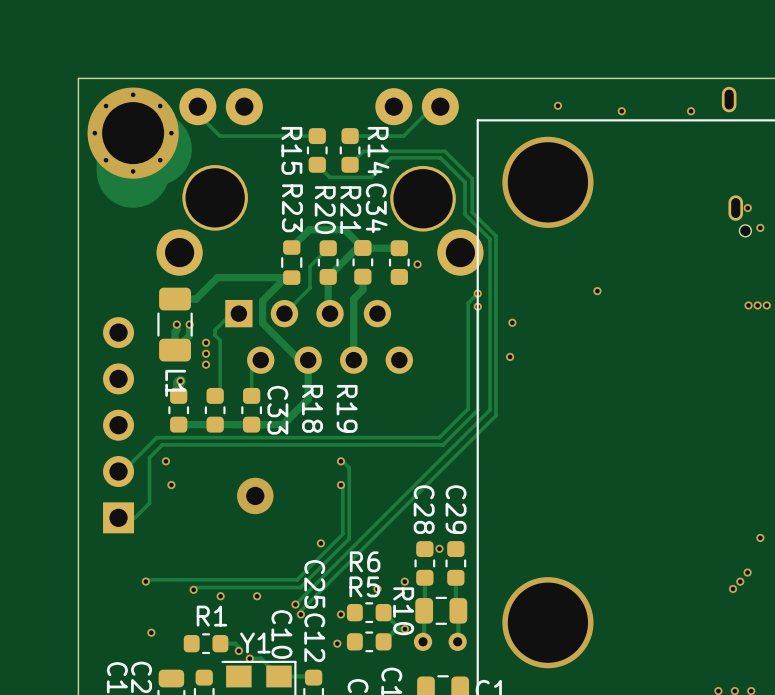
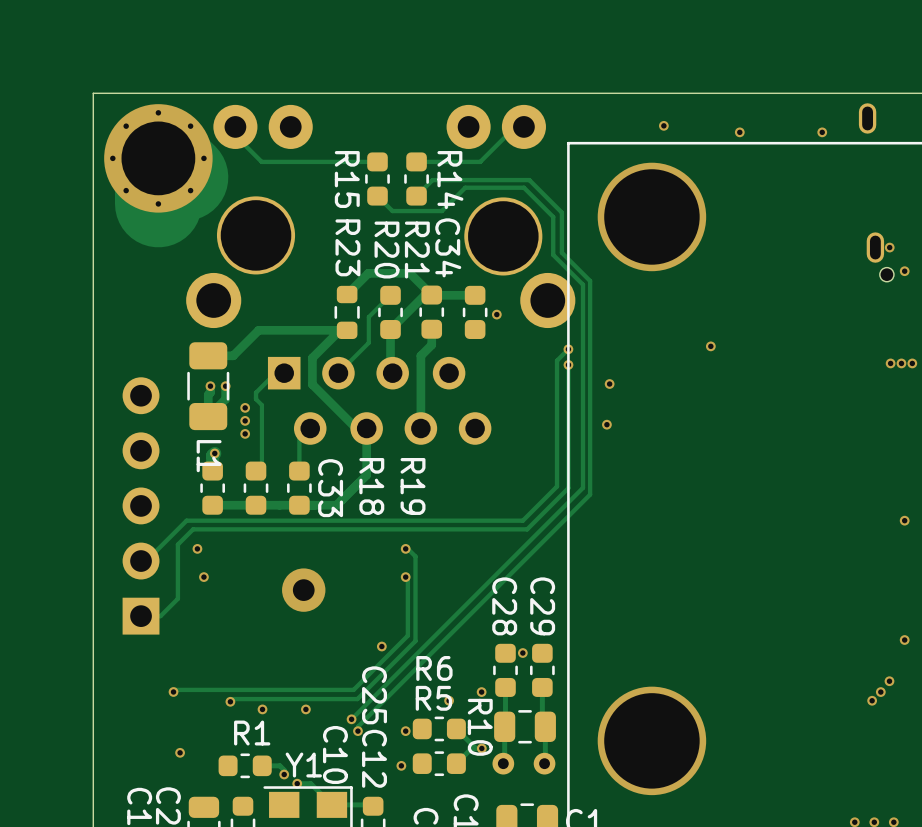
via: none -> (904, 520)

